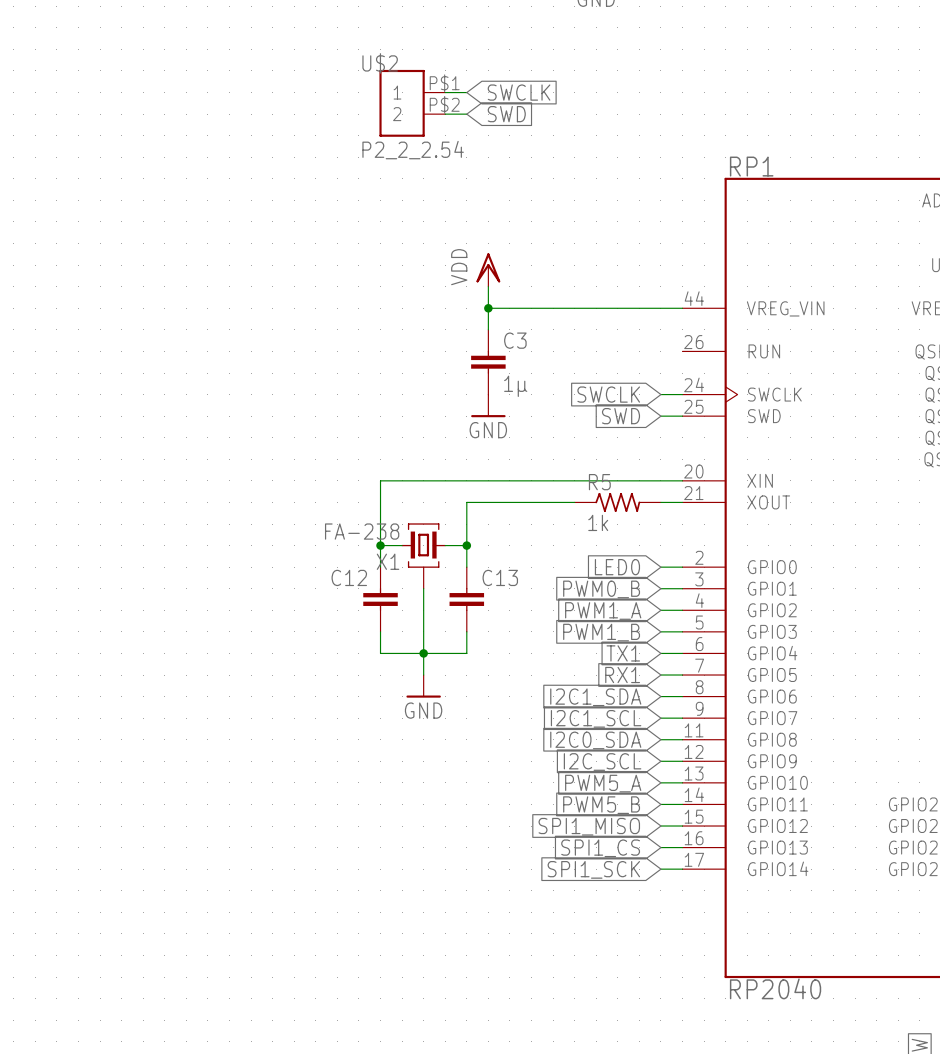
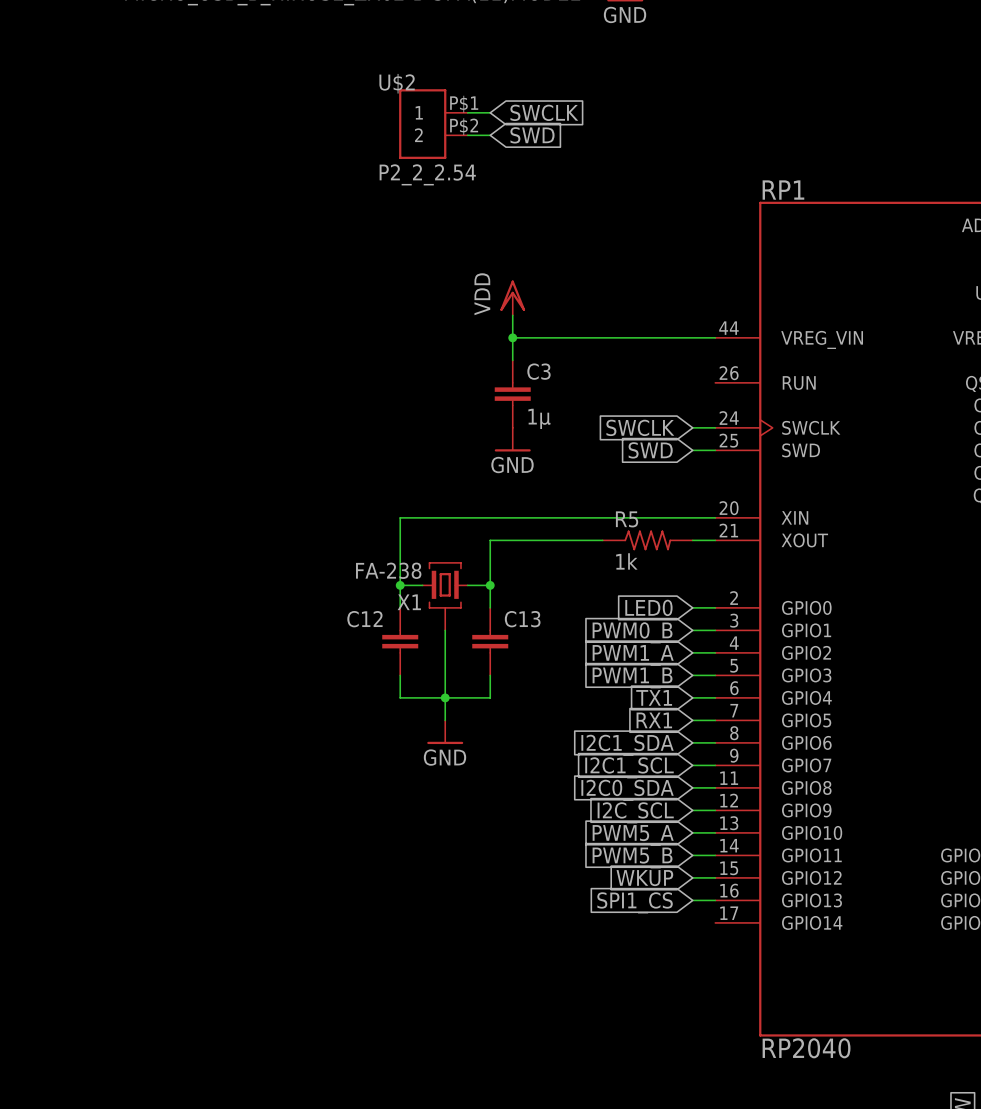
global label: SPI1_MISO (589, 826) -> WKUP (644, 878)
global label: SPI1_SCK (593, 869) -> none
wire: (660, 869) (682, 869) -> none

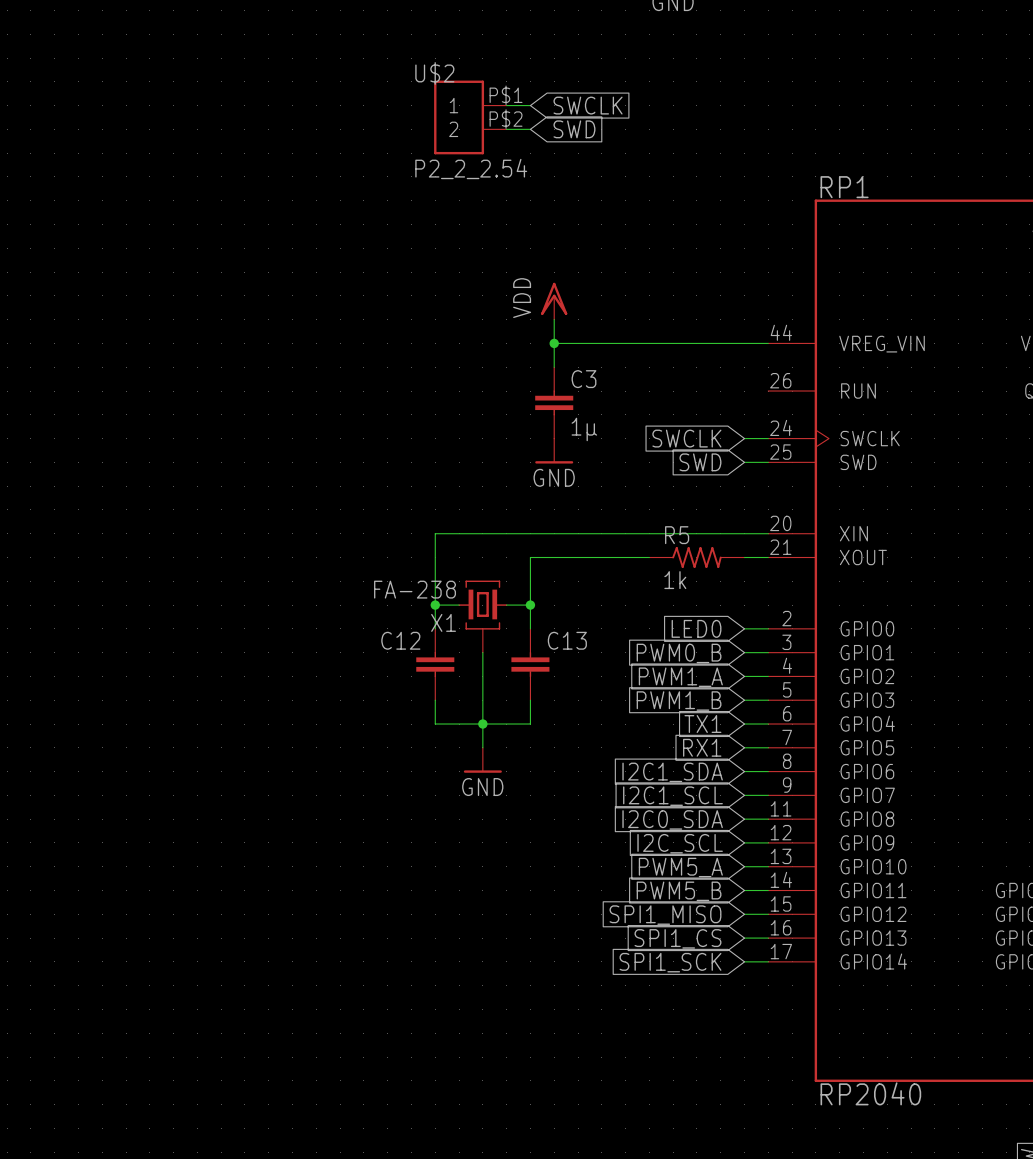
global label: WKUP (644, 878) -> SPI1_MISO (665, 915)
wire: none -> (744, 961) (768, 961)
global label: none -> SPI1_SCK (670, 962)

